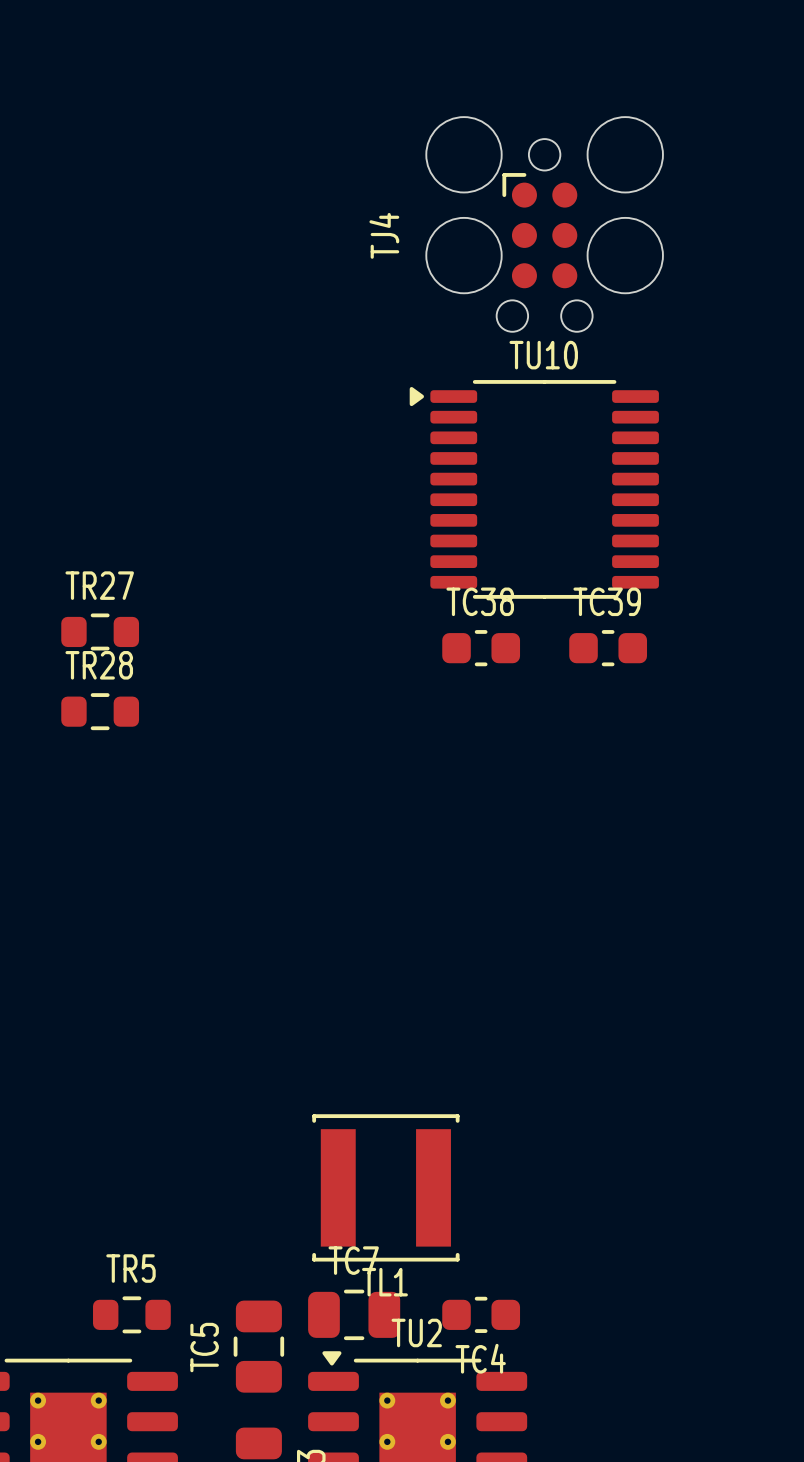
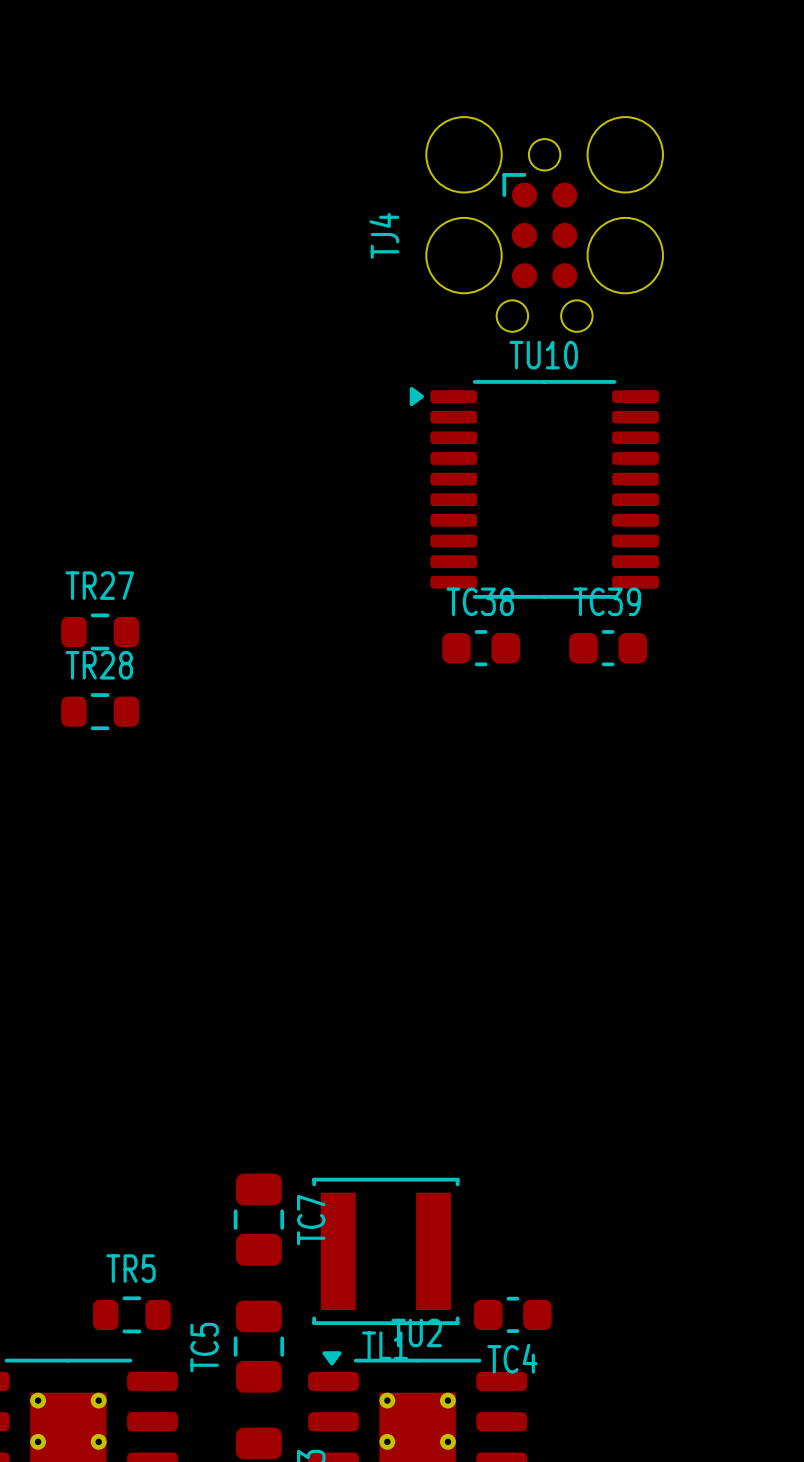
TL1 position: (385, 1187) -> (385, 1251)
TC7 rotation: 0° (354, 1314) -> 90° clockwise (258, 1219)
TC7 position: (354, 1314) -> (258, 1219)
TC4 position: (481, 1314) -> (512, 1314)

